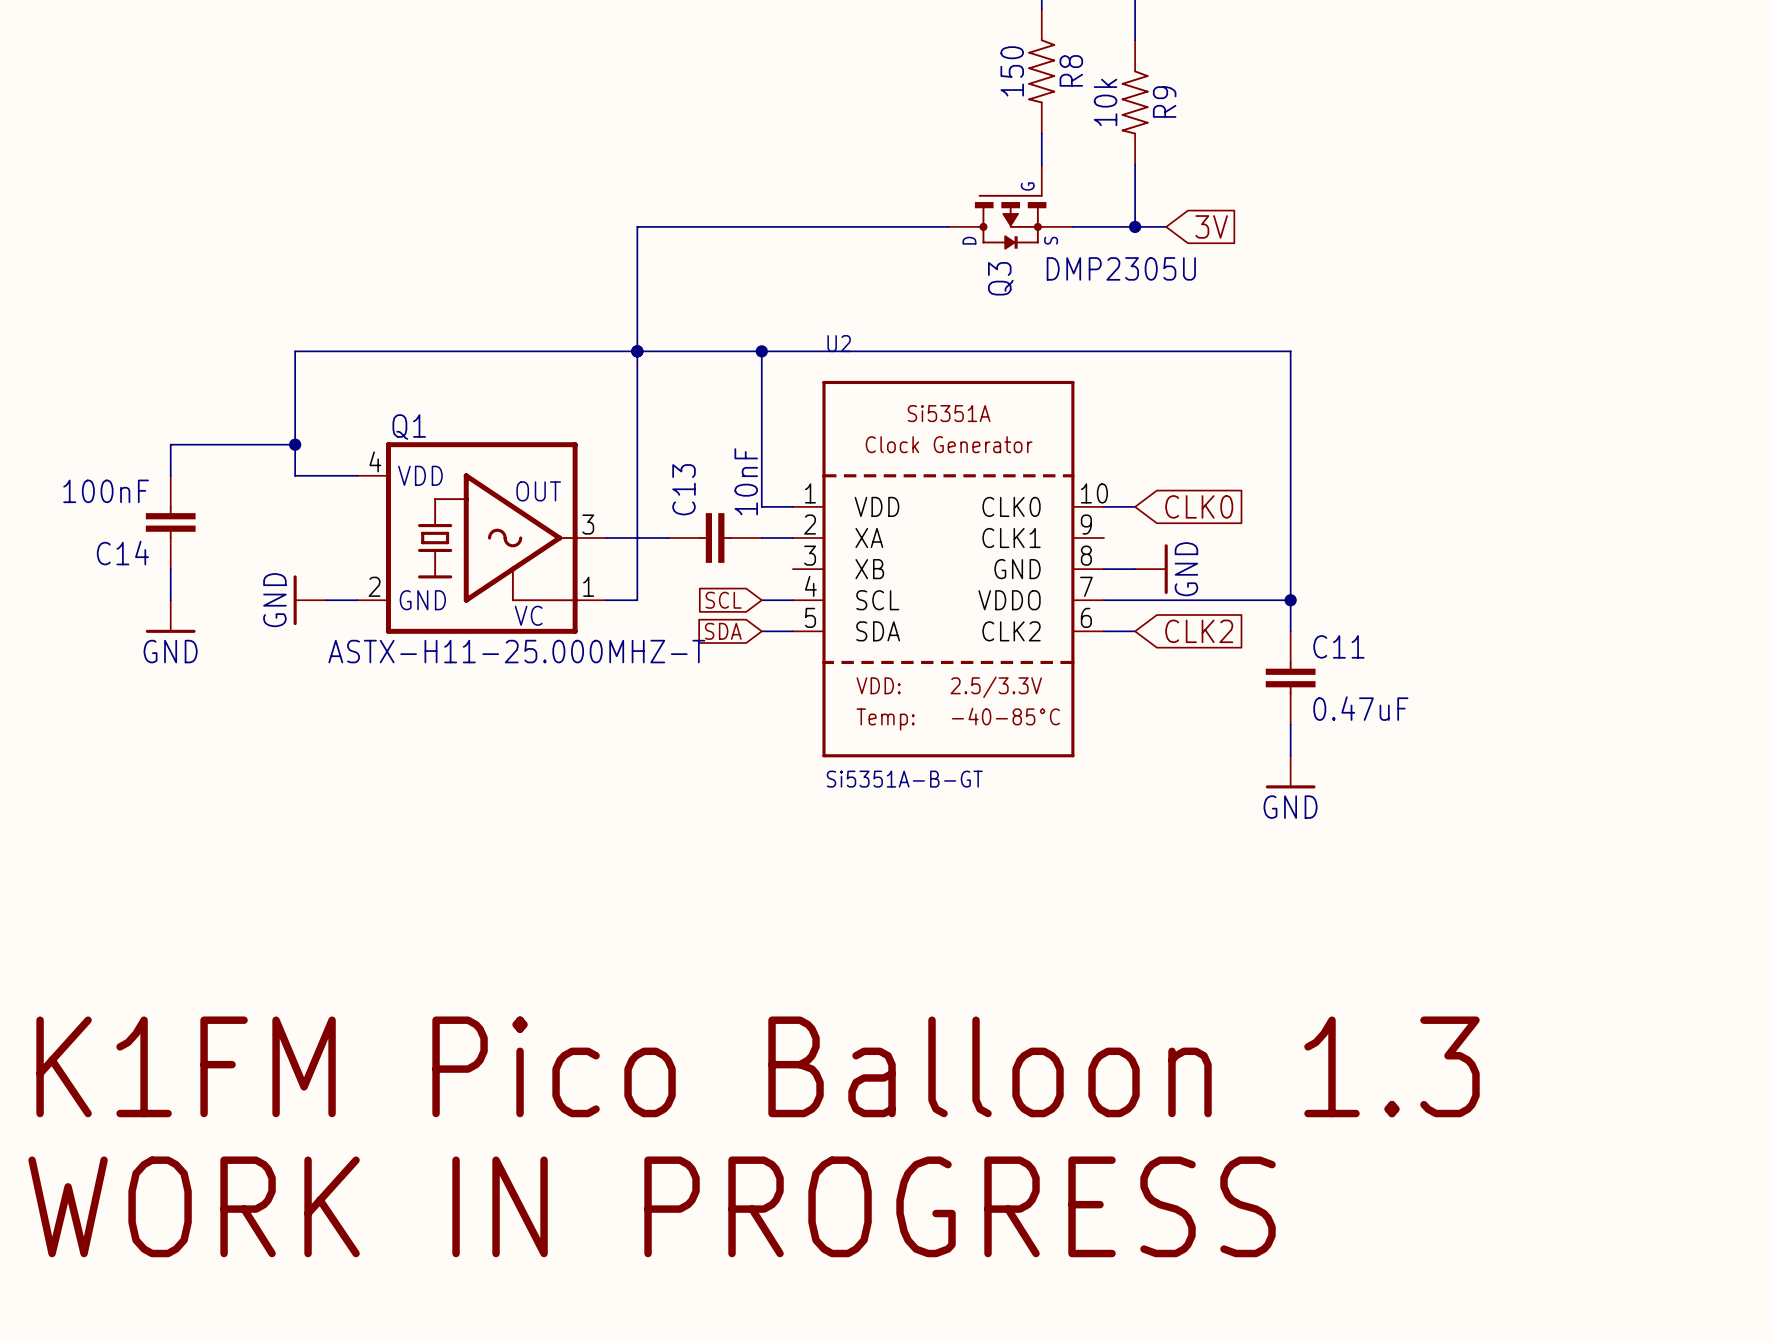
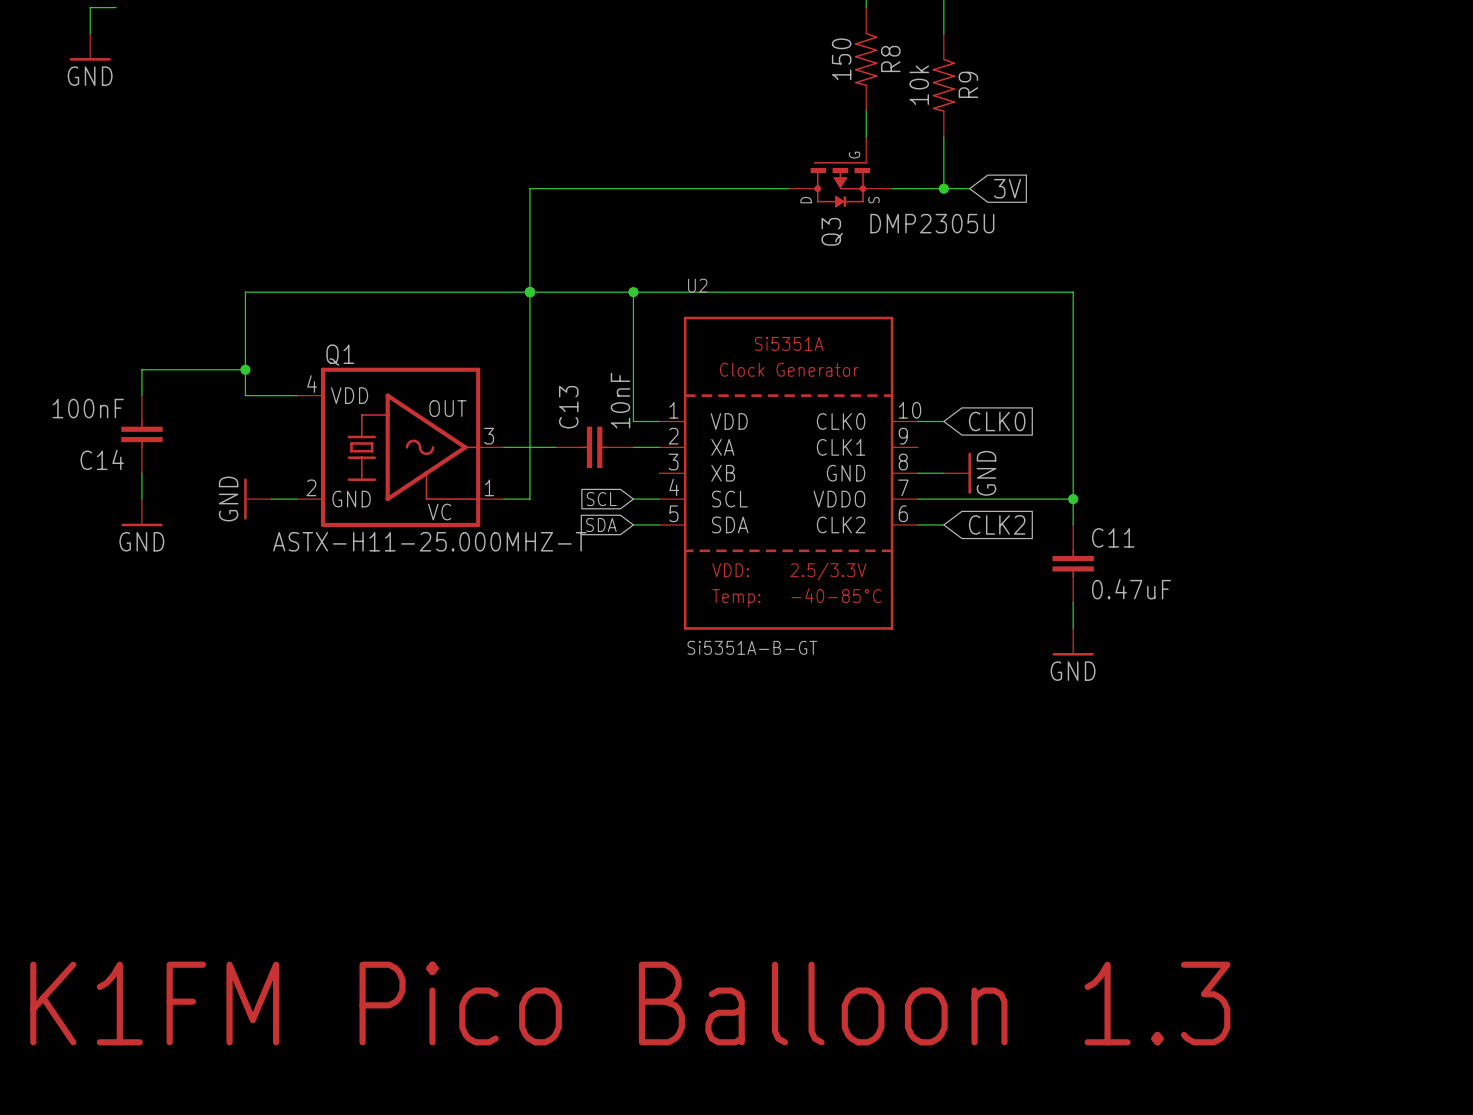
wire: none -> (116, 7) (90, 7) (90, 33)
power symbol: none -> GND (90, 47)
text: K1FM Pico Balloon 1.3 (758, 1066) -> none
text: WORK IN PROGRESS (652, 1206) -> K1FM Pico Balloon 1.3 (630, 1003)

